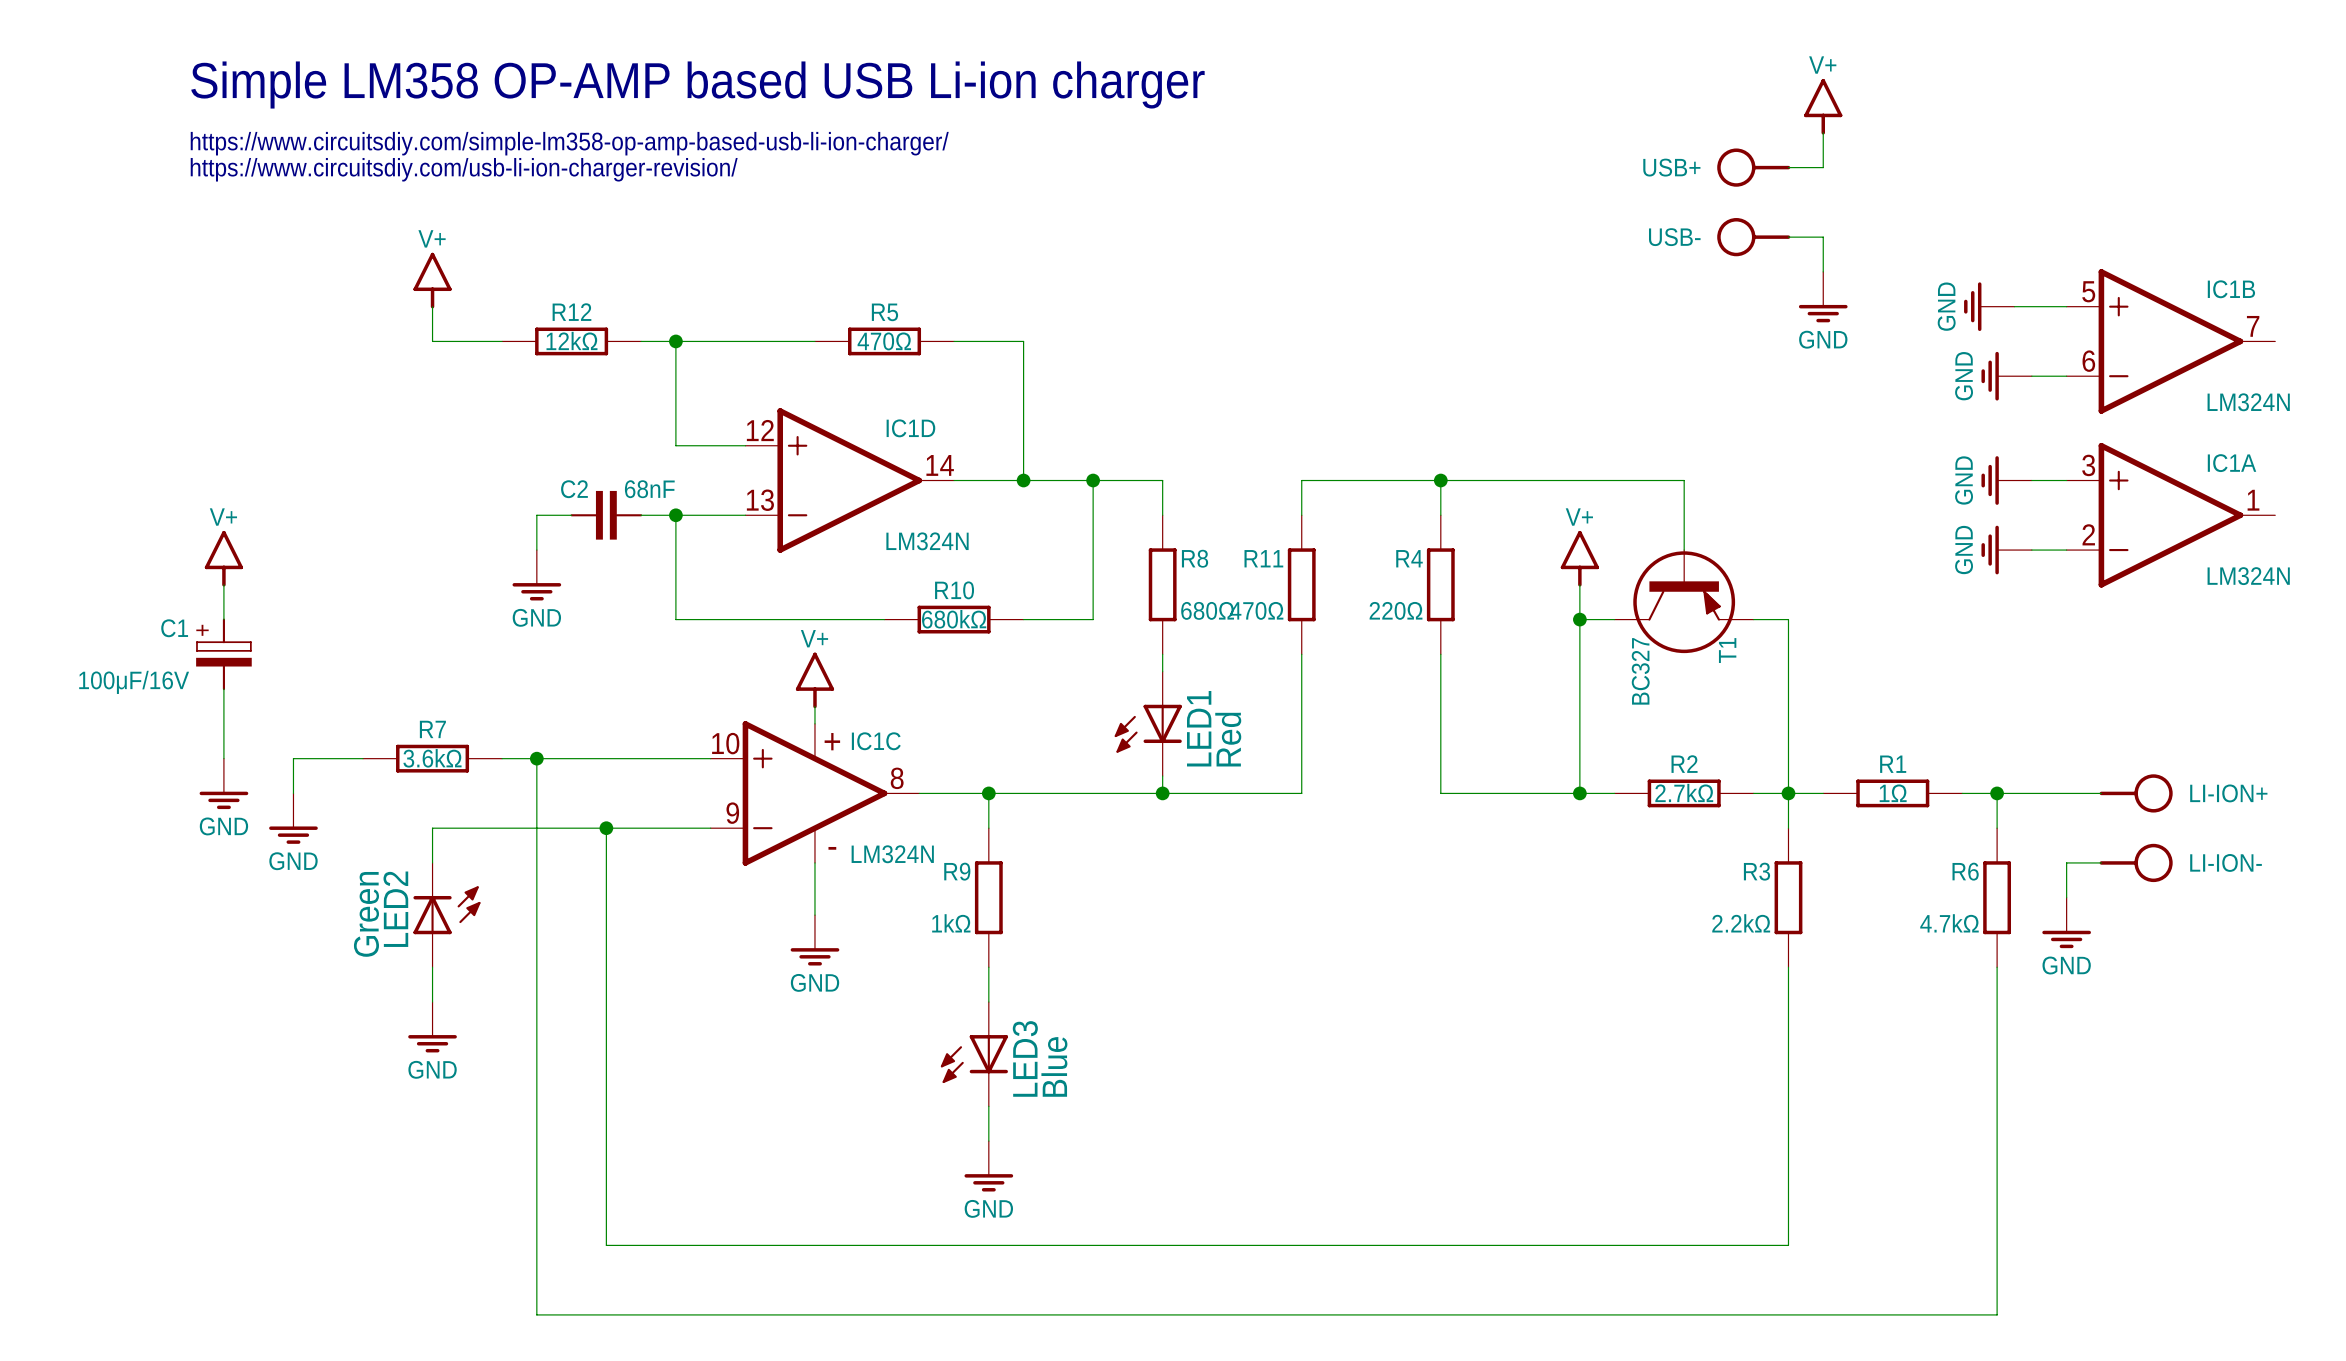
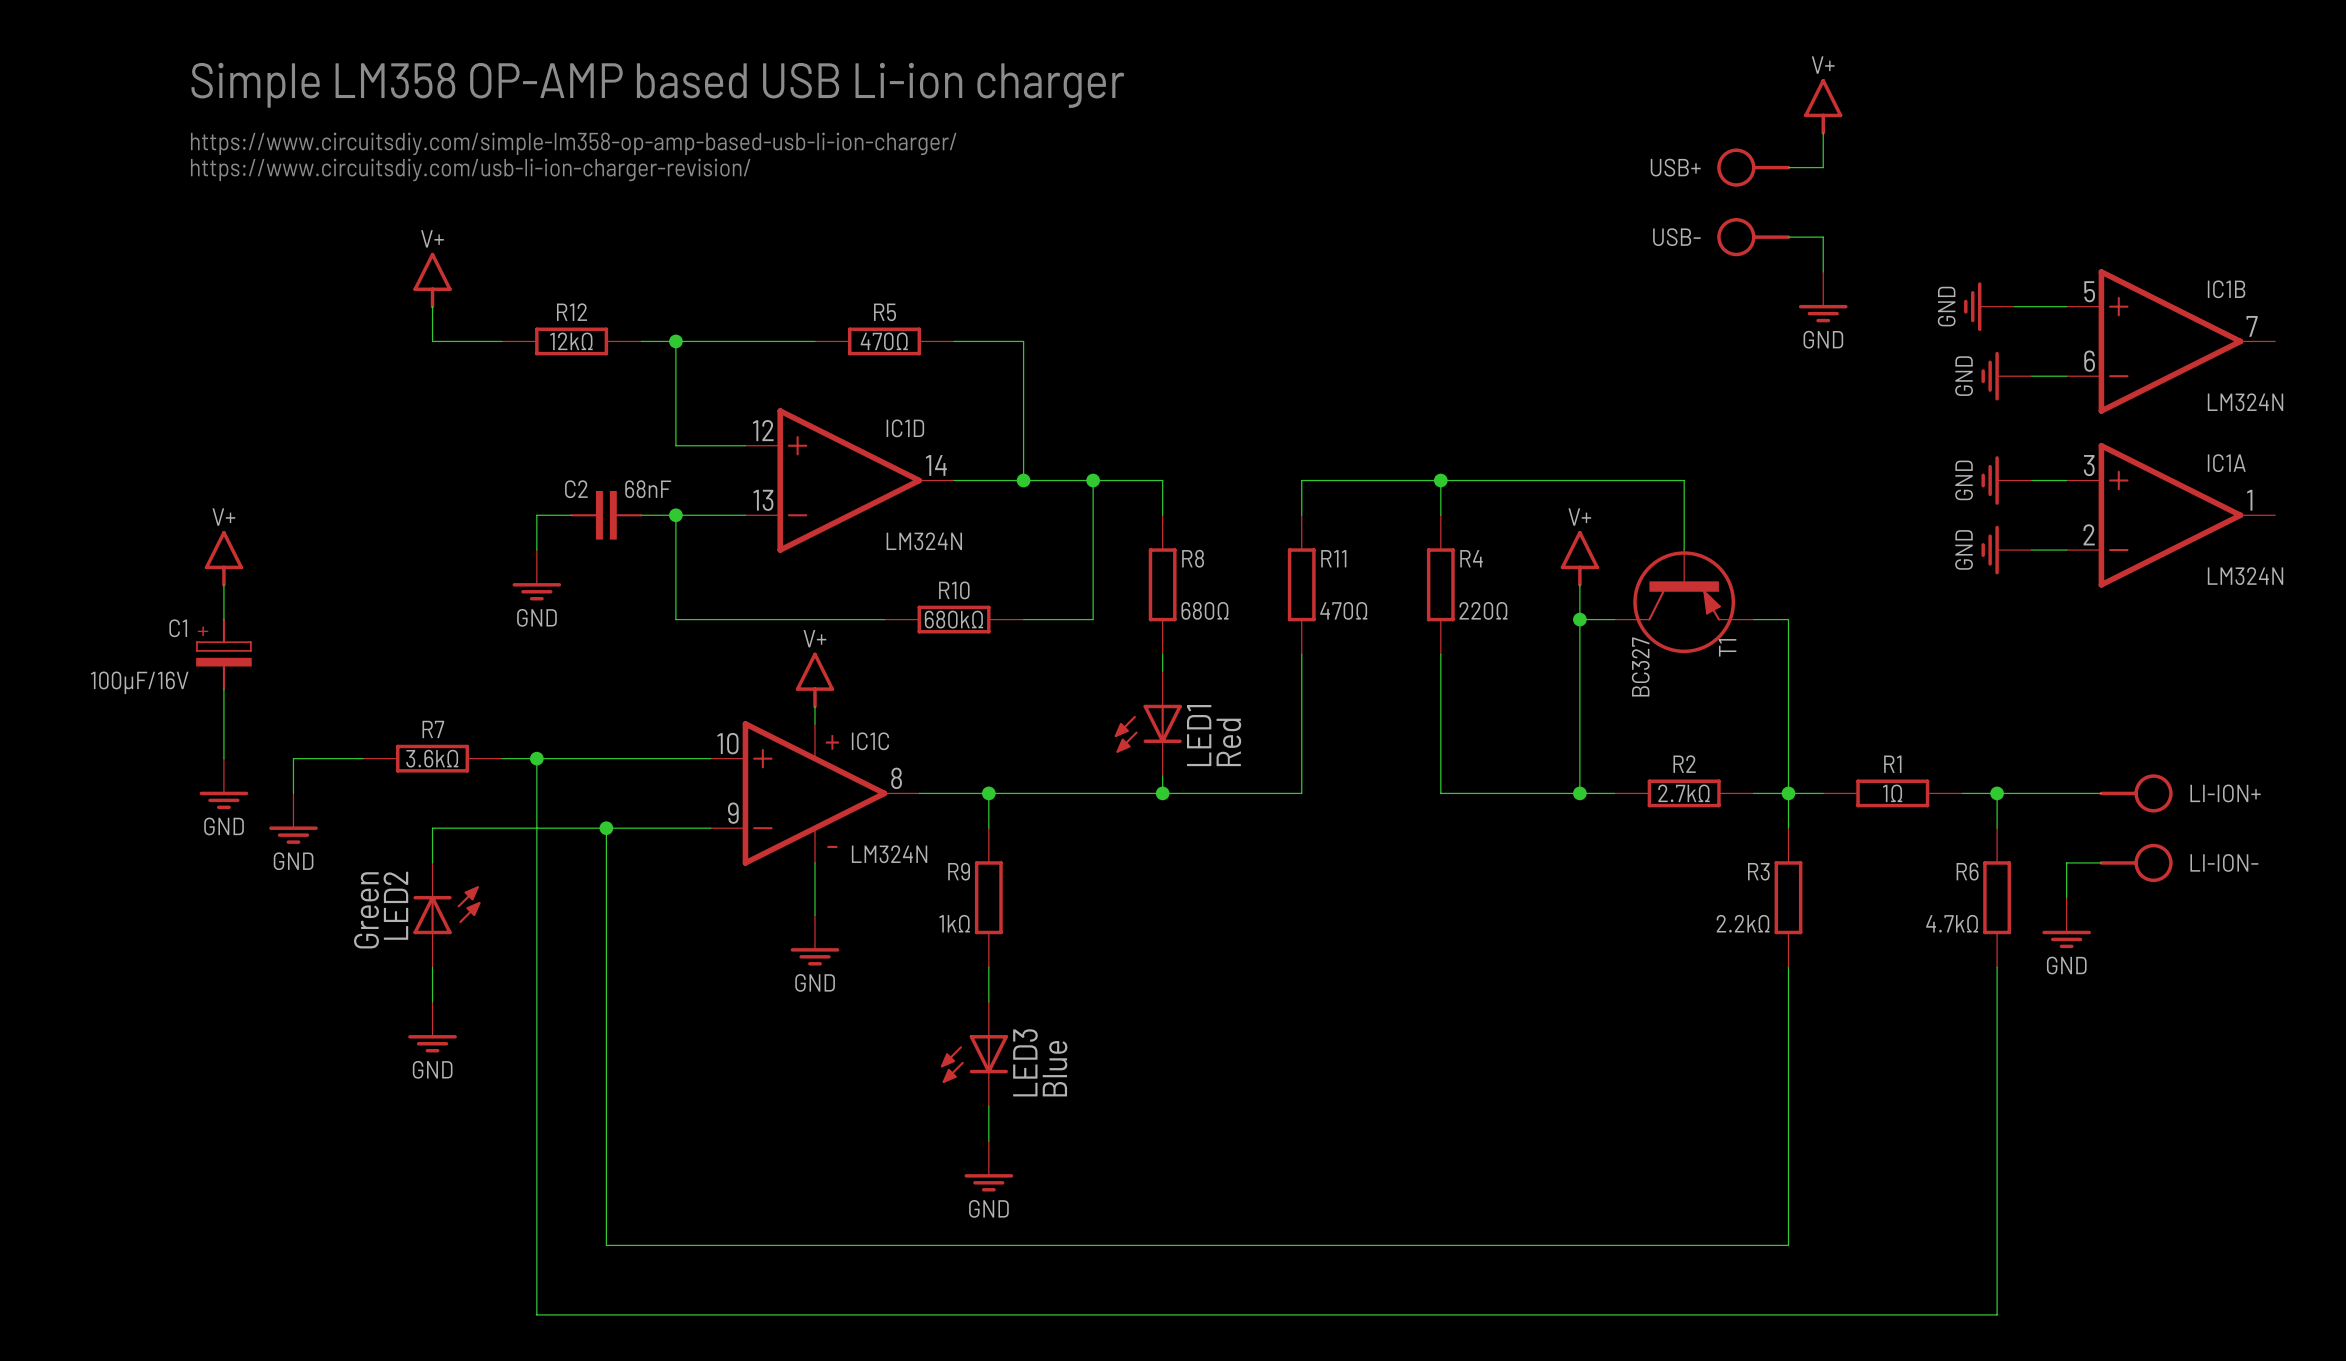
R11 name position: R11 (1263, 558) -> R11 (1333, 558)
R4 name position: R4 (1409, 558) -> R4 (1471, 558)
R11 value position: 470Ω (1256, 610) -> 470Ω (1343, 610)
R4 value position: 220Ω (1396, 610) -> 220Ω (1483, 610)

